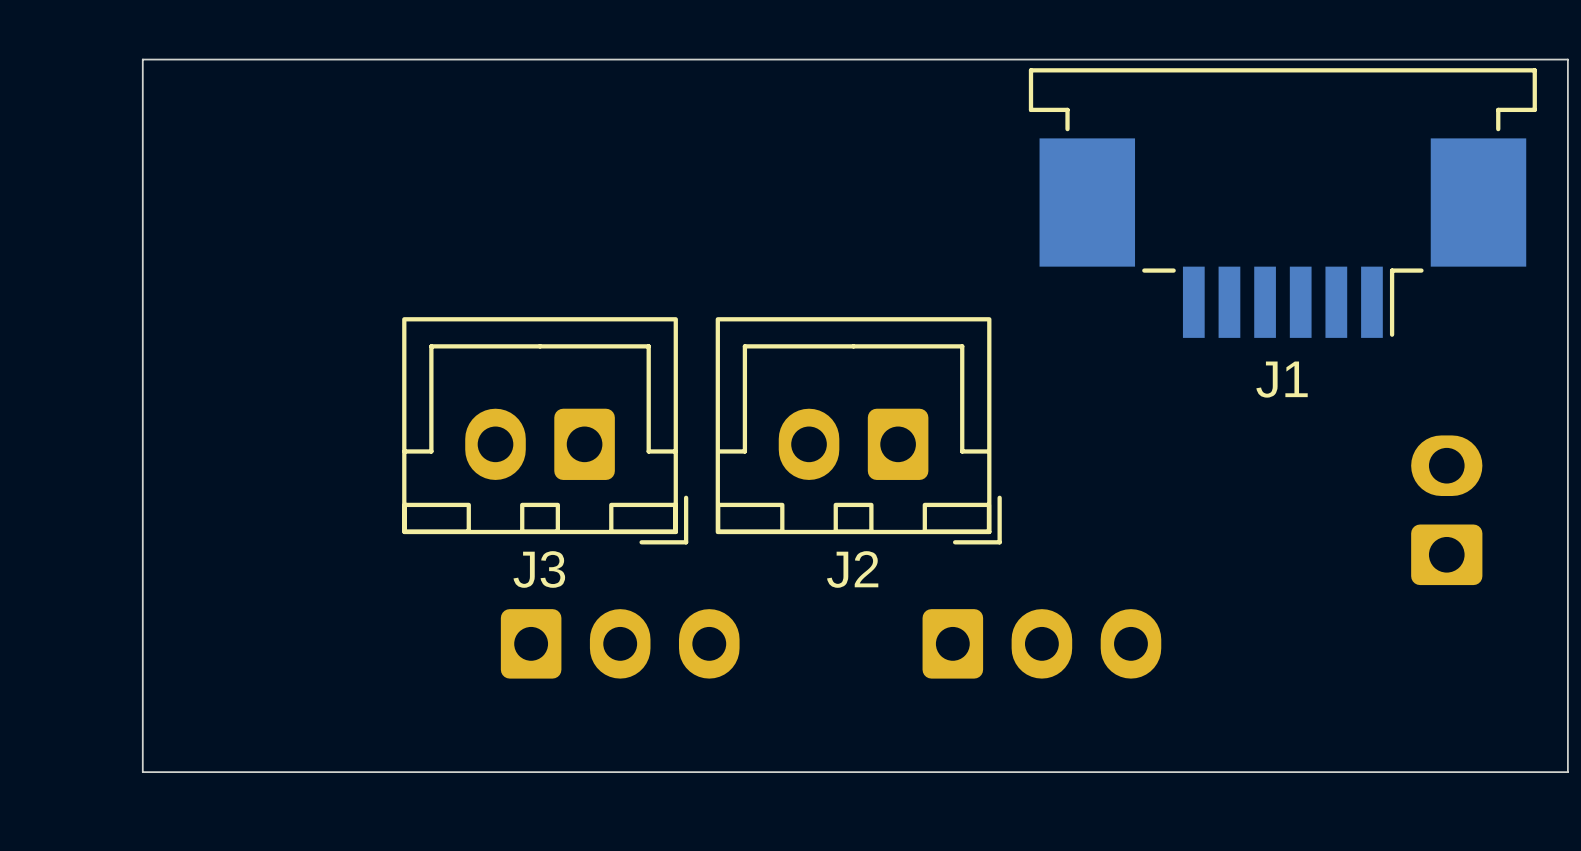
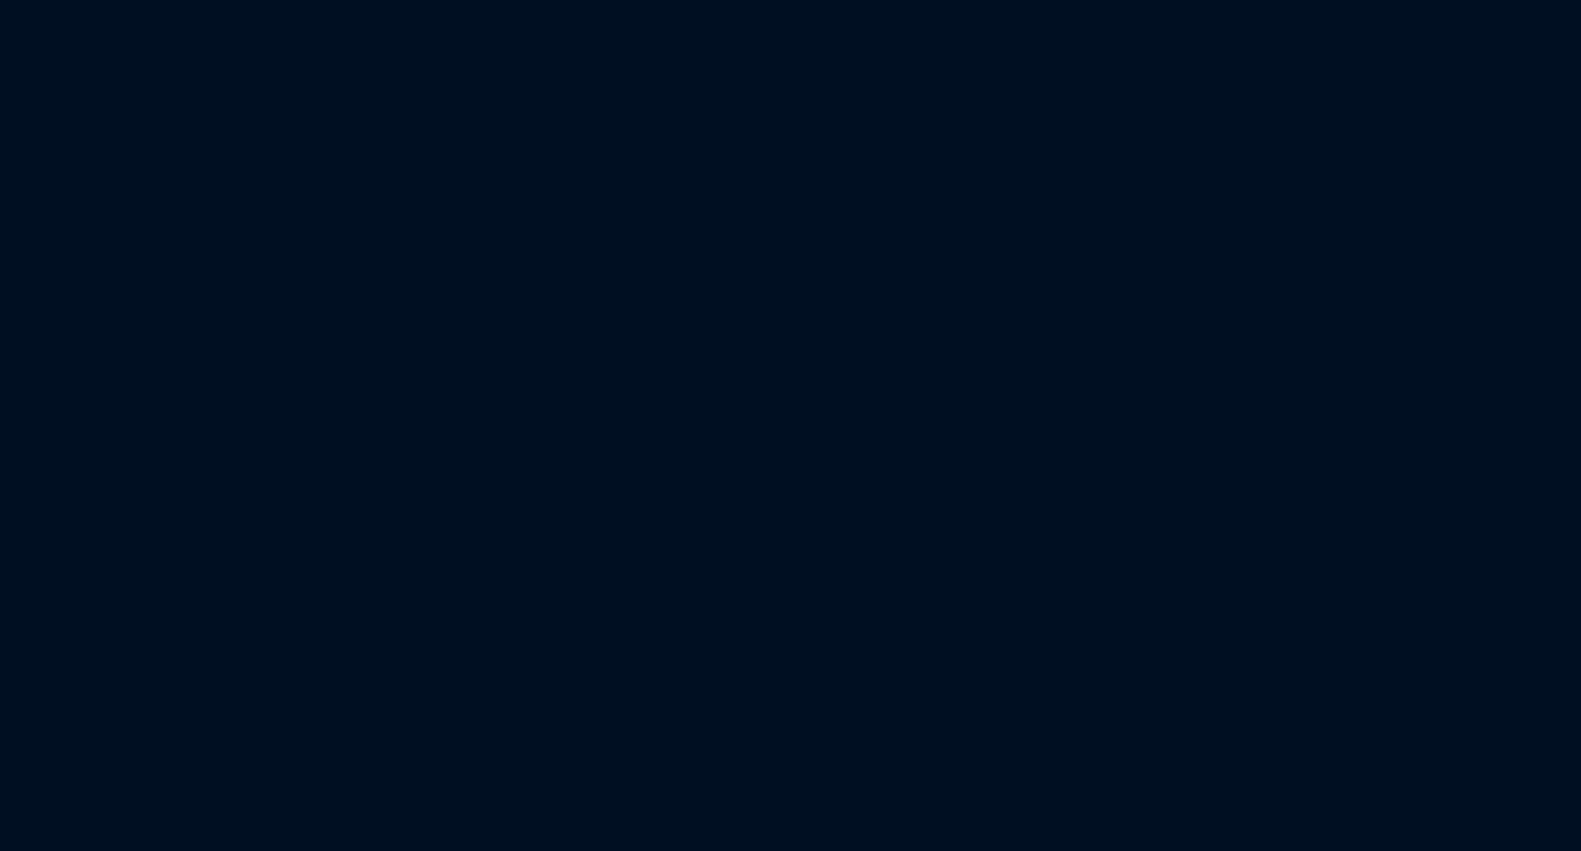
board edge: (1567, 59) (142, 59) (142, 772) (1567, 772) (1567, 59) -> none
J1: (1282, 203) -> none
J3: (545, 430) -> none
J2: (858, 430) -> none
part: (1446, 510) -> none
part: (620, 643) -> none
part: (1041, 643) -> none

